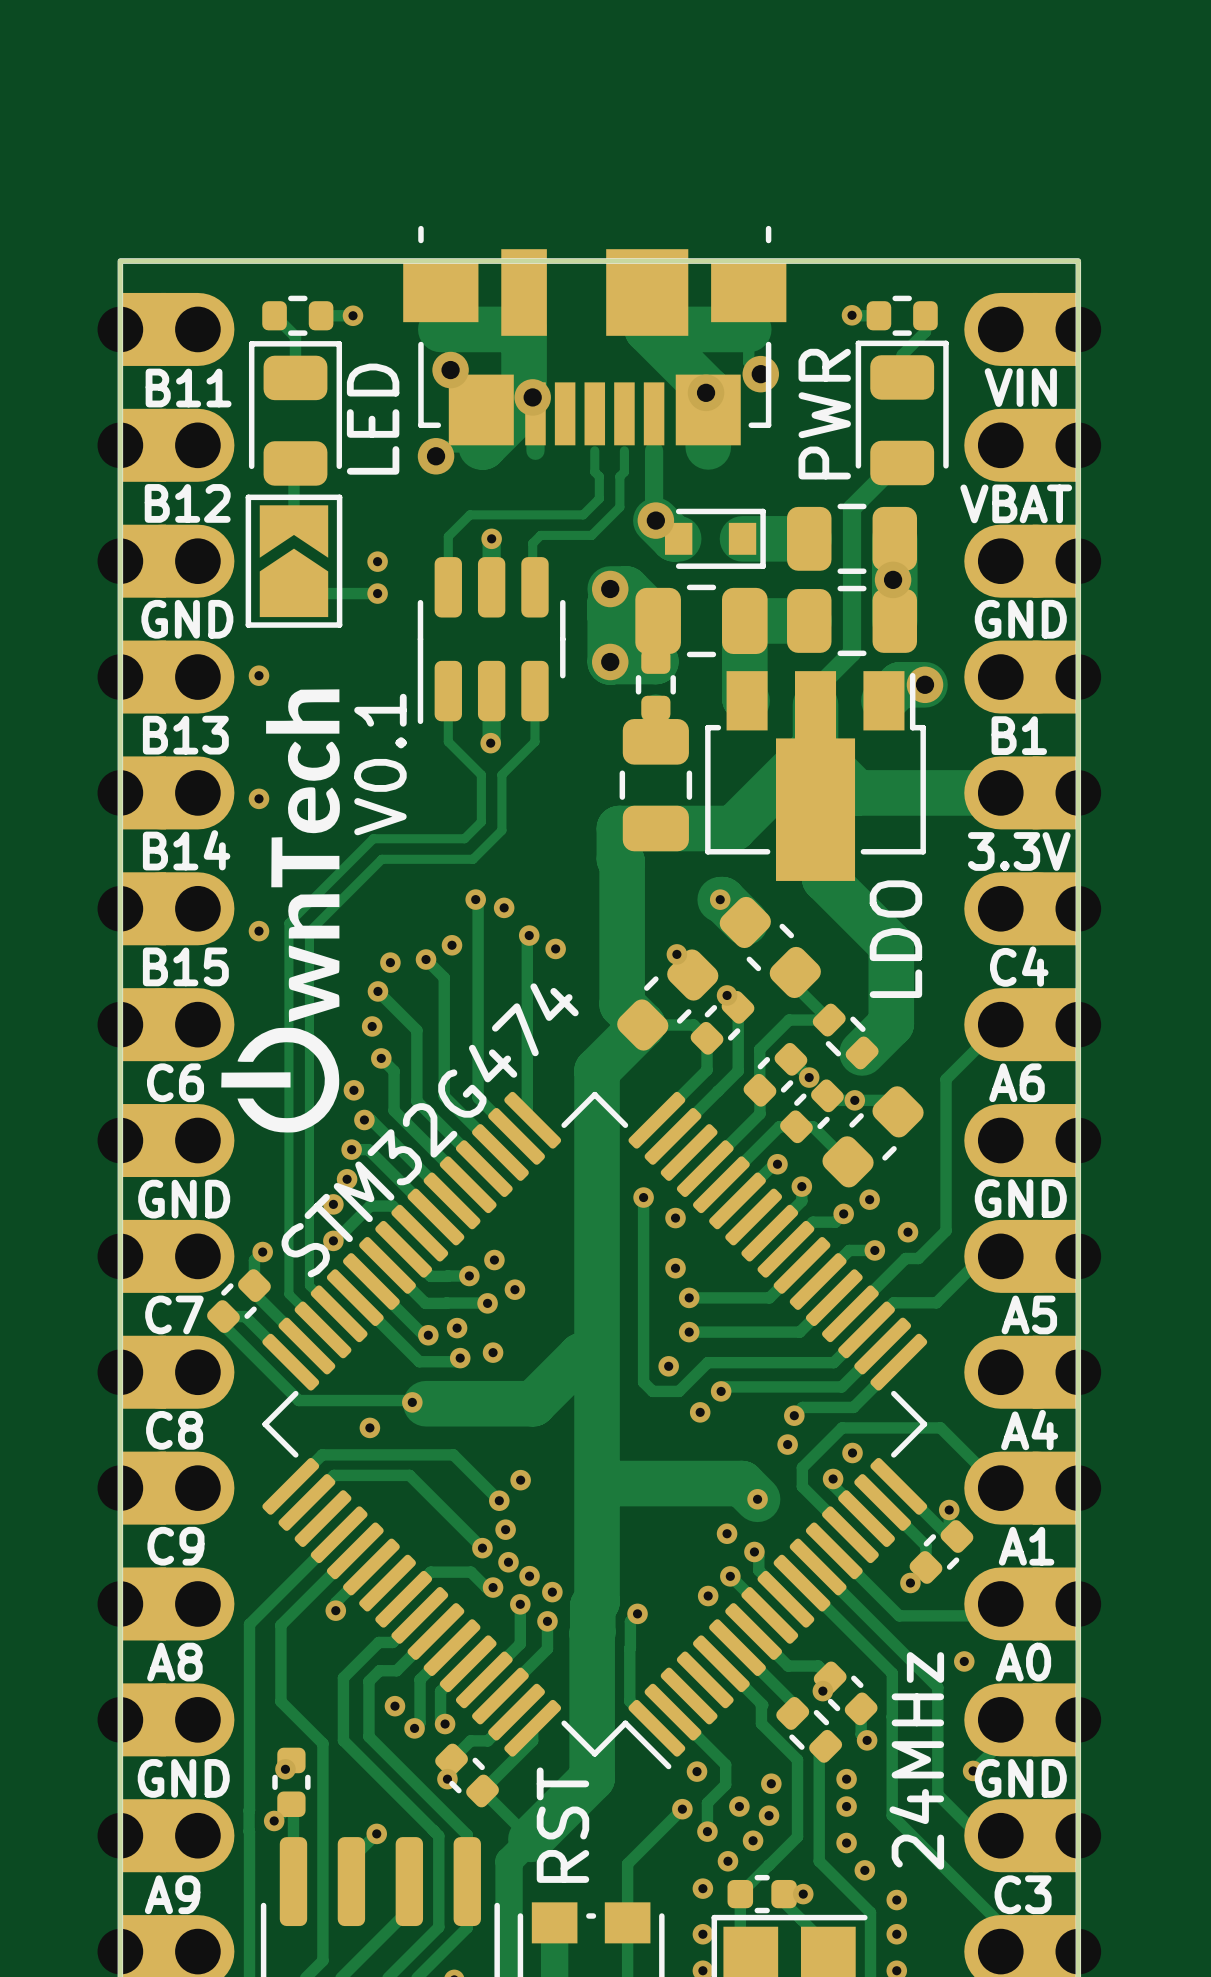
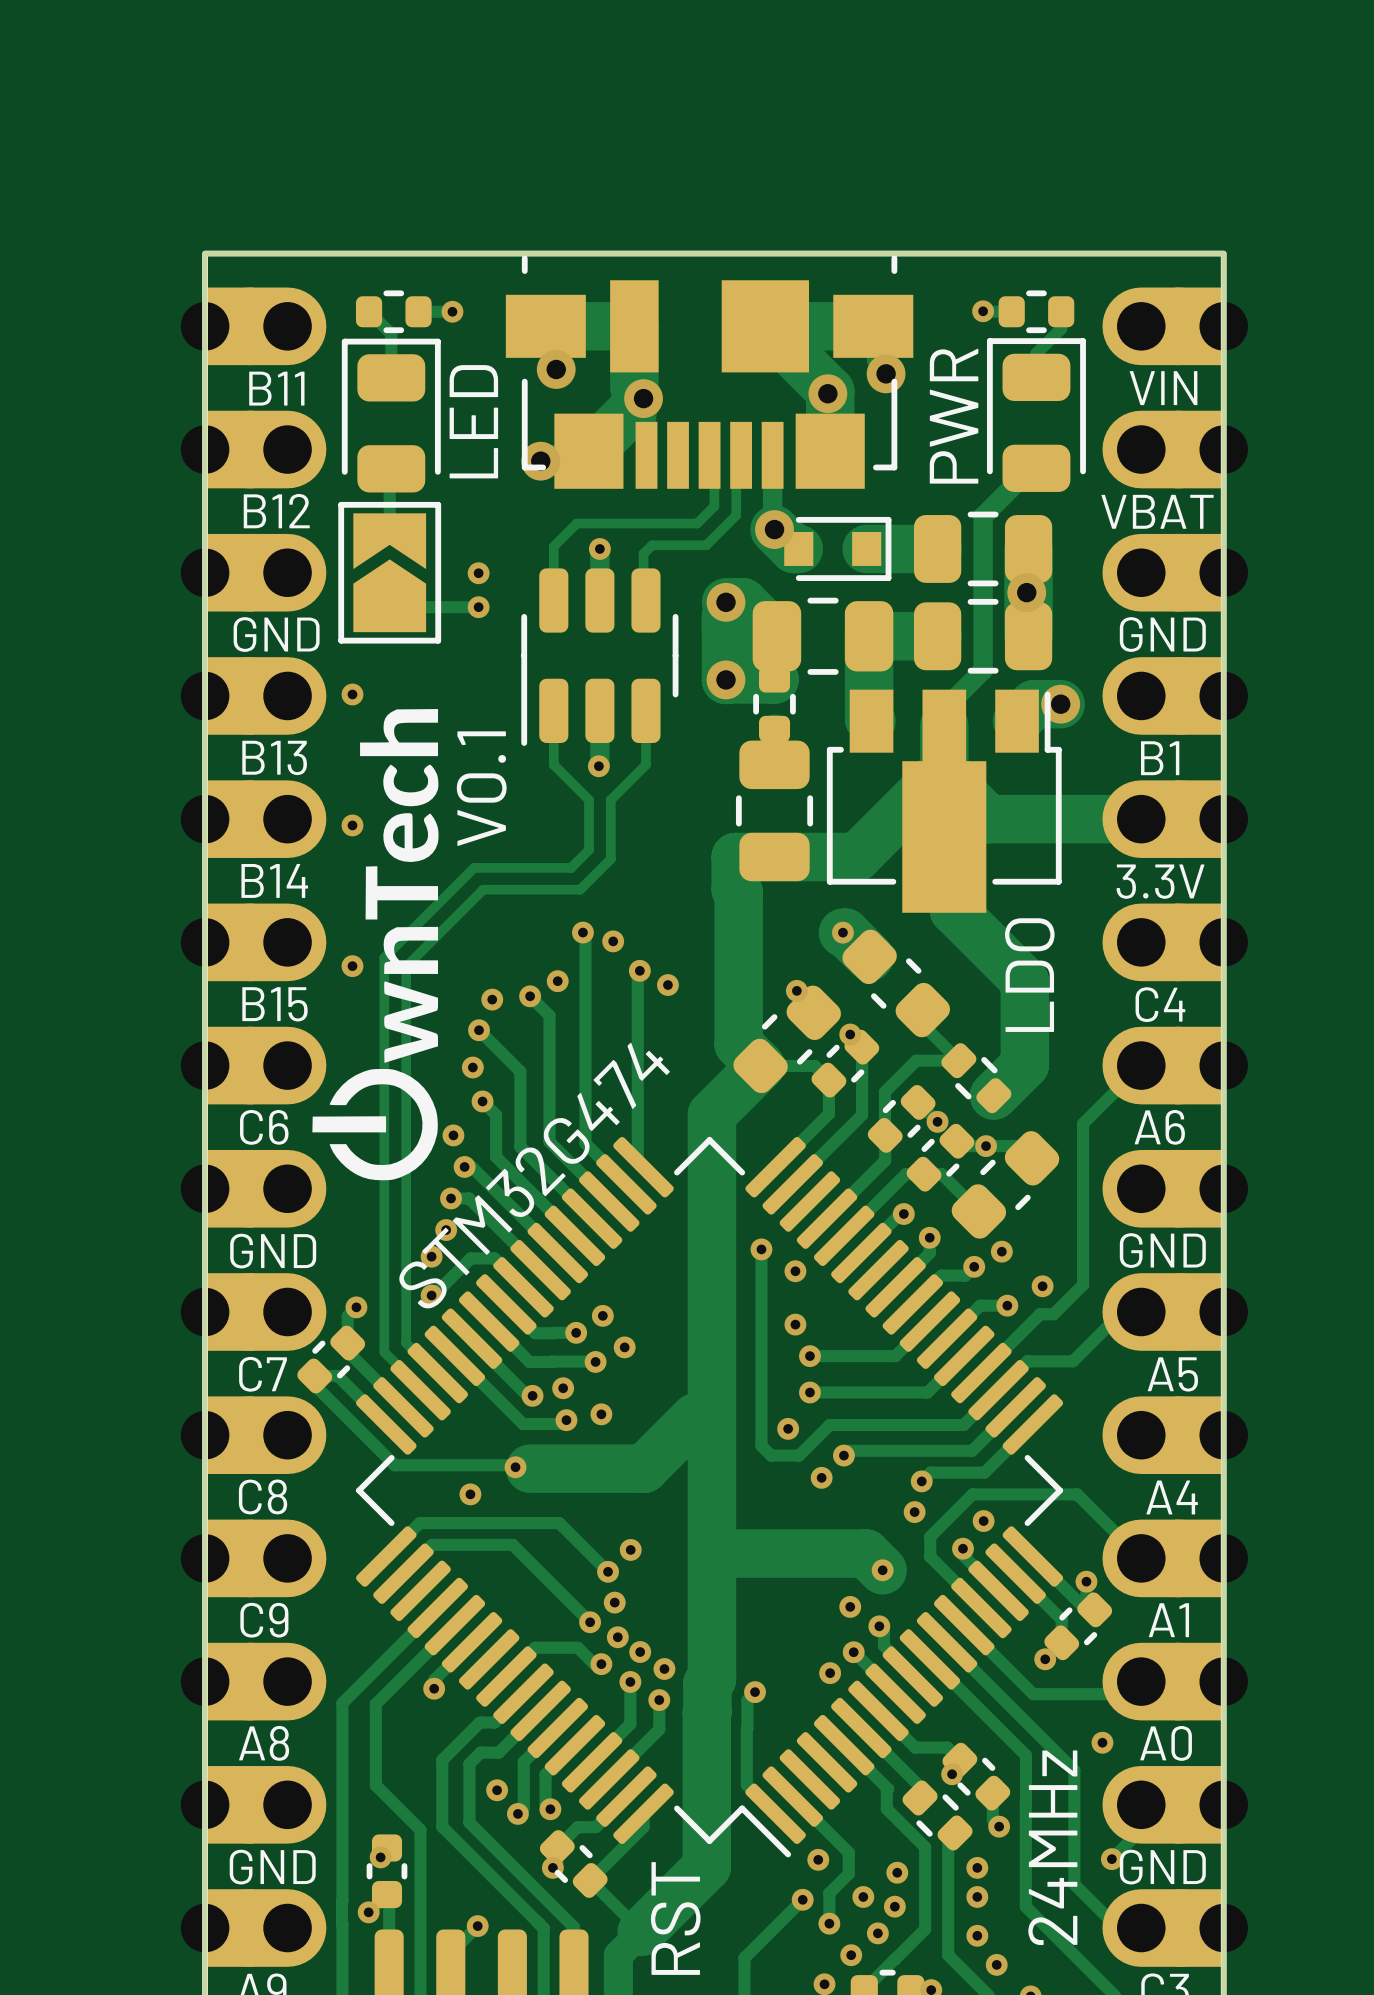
part position: (594, 335) -> (709, 372)

